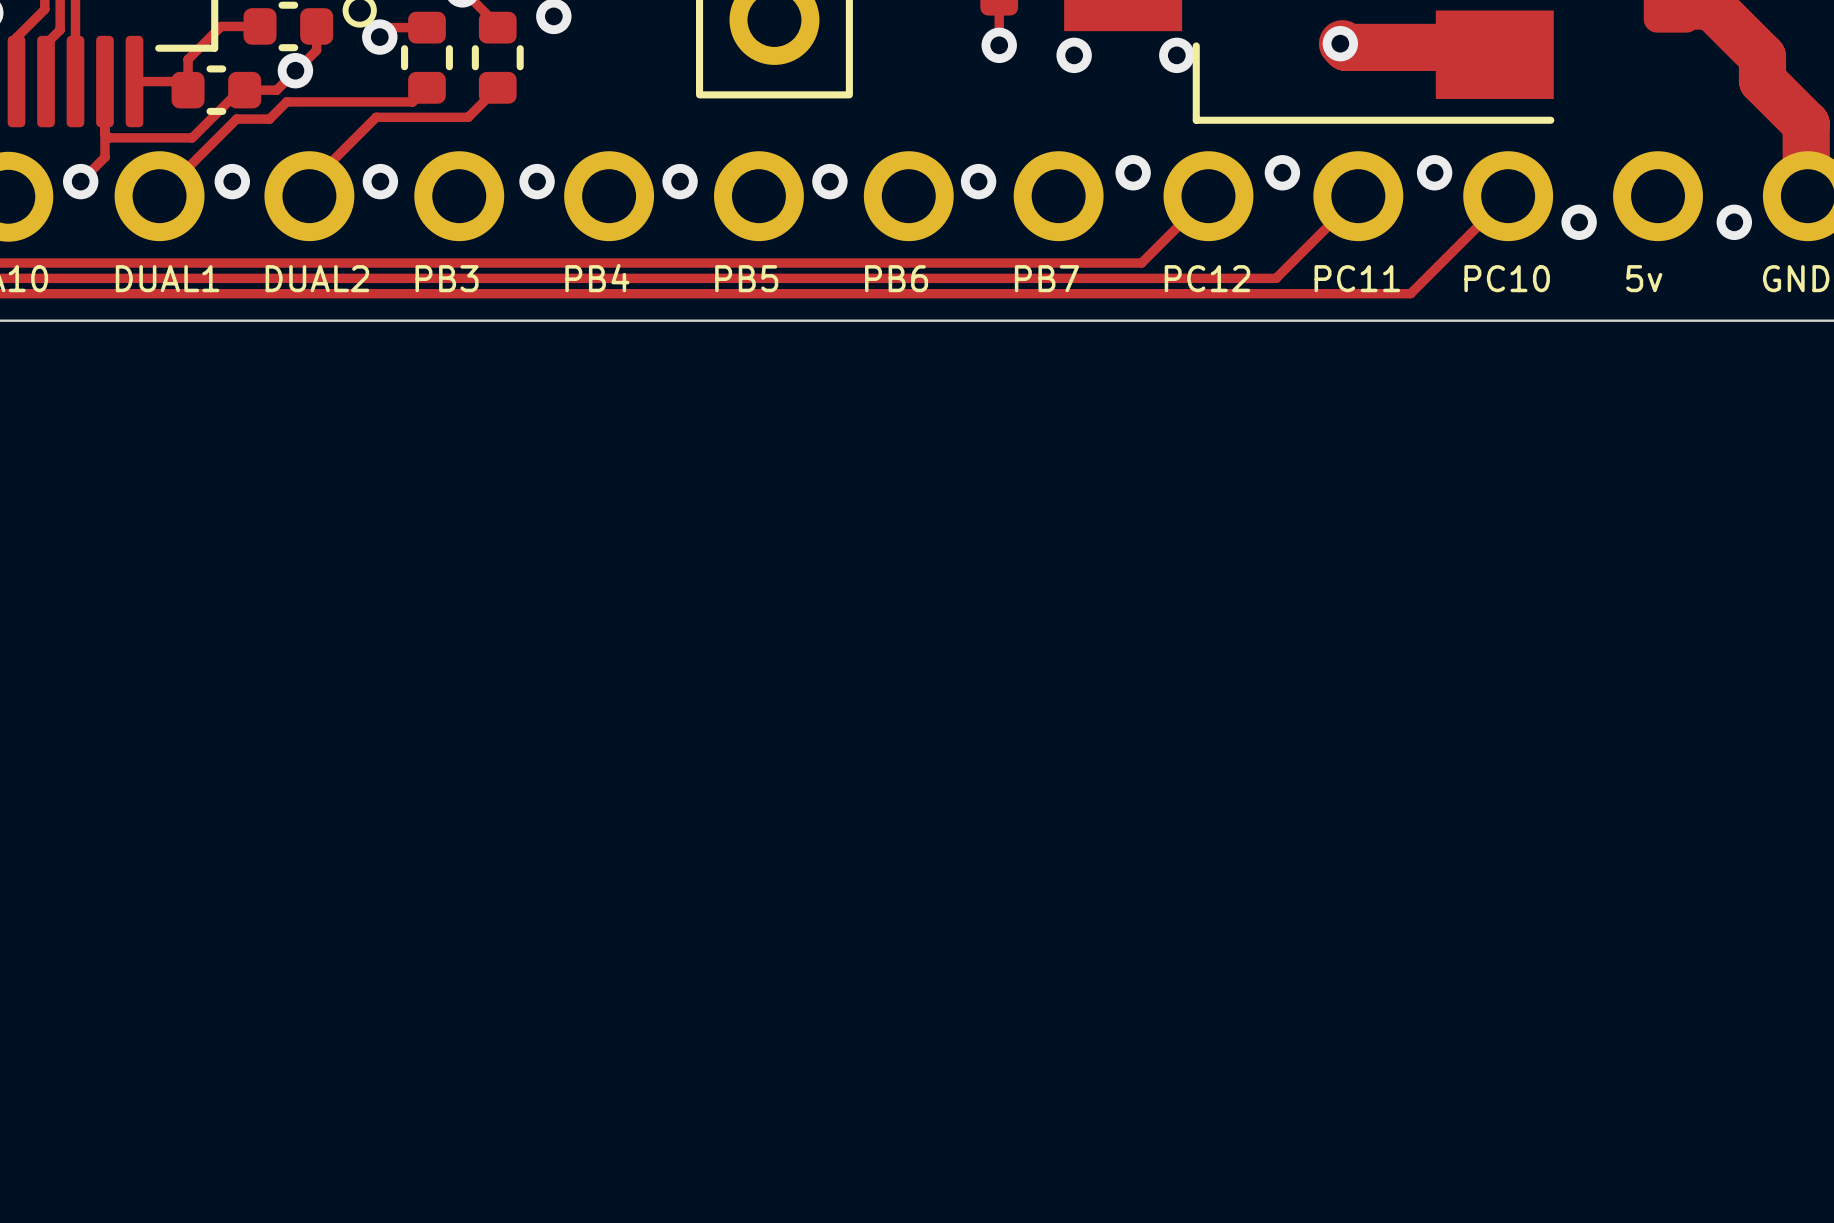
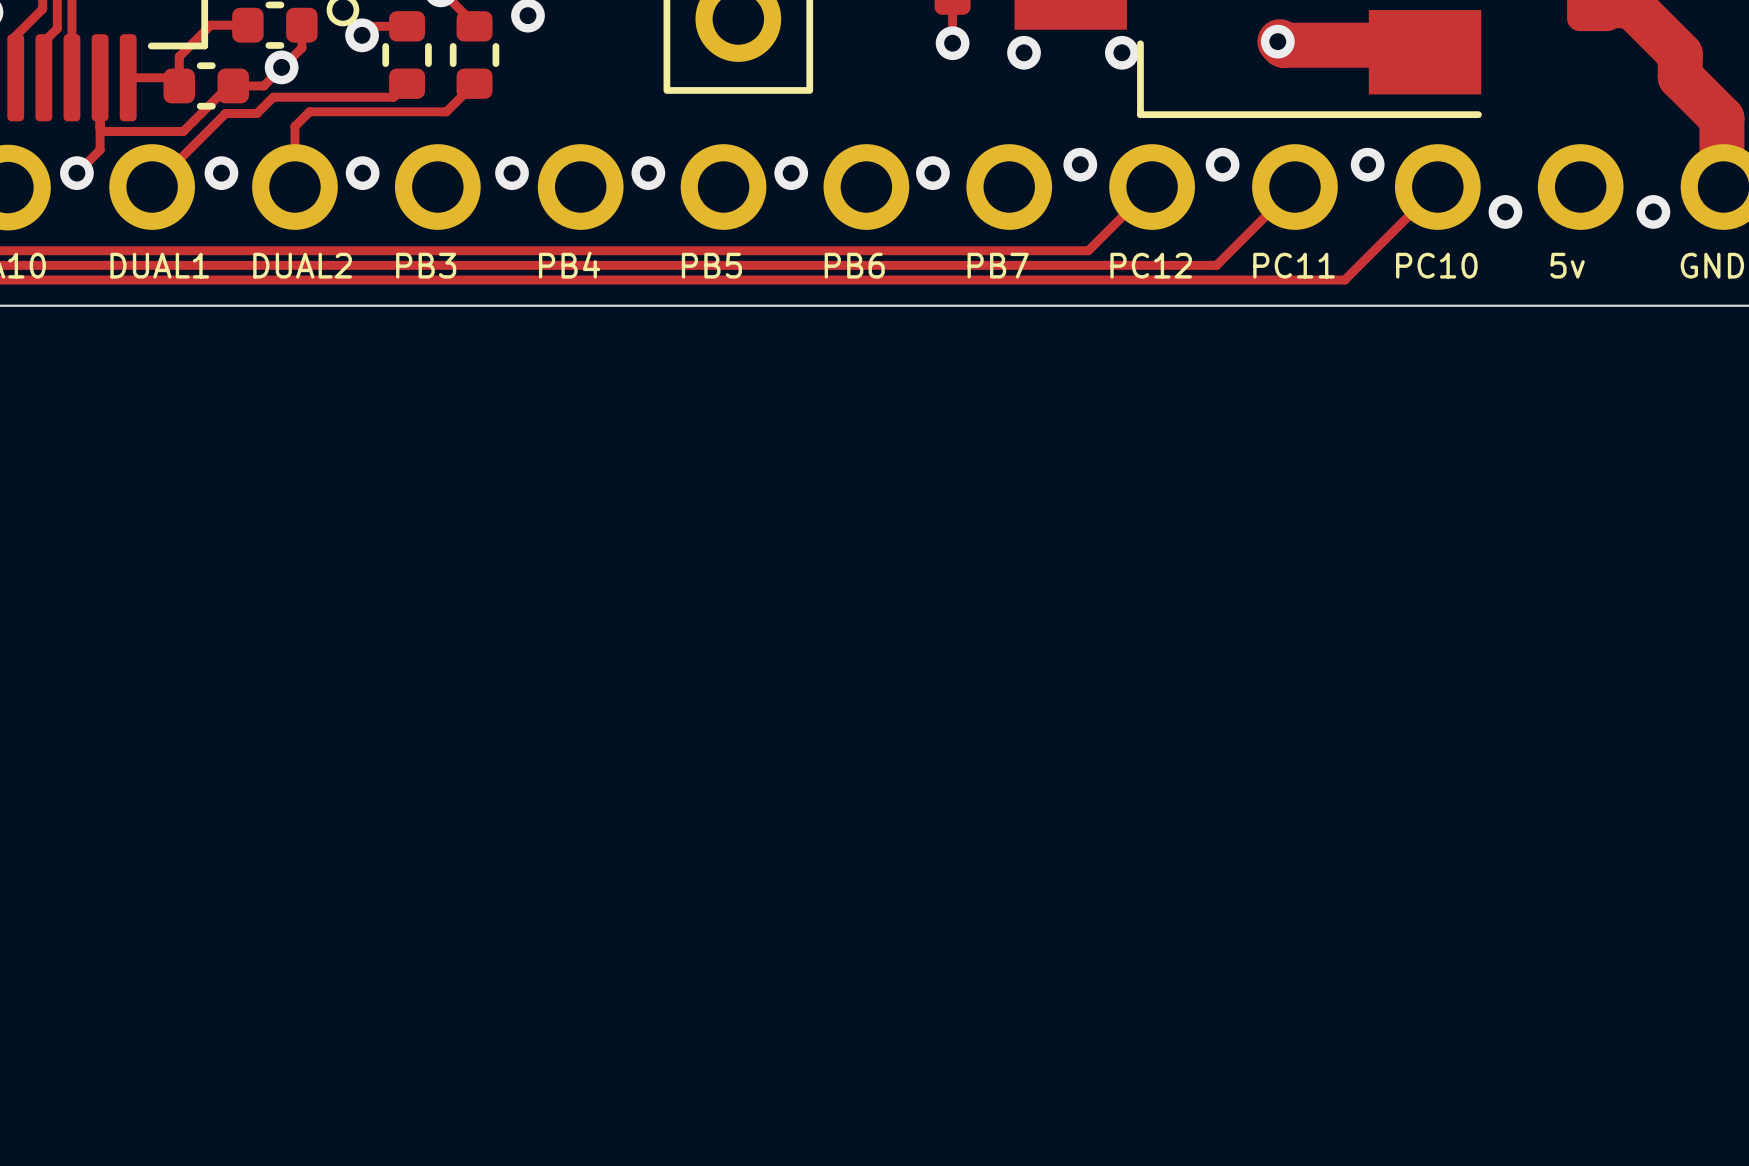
track: (376, 117) (309, 184) -> (358, 111) (309, 111) (294, 126) (294, 175)

